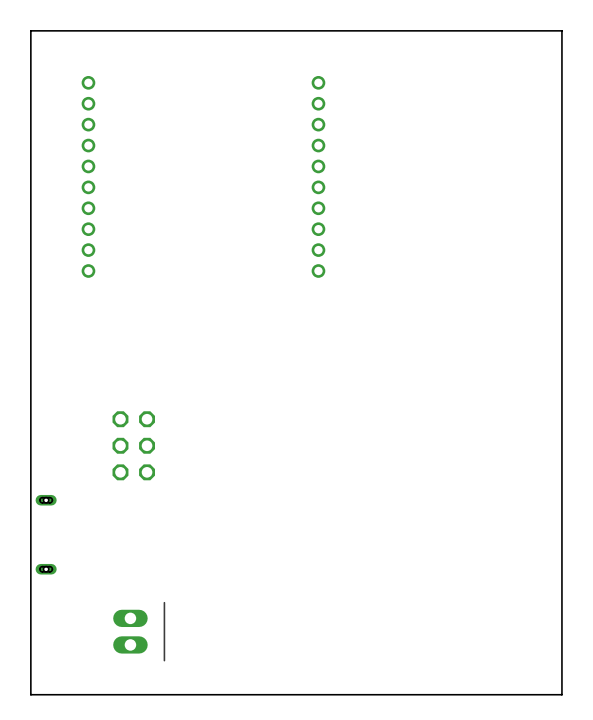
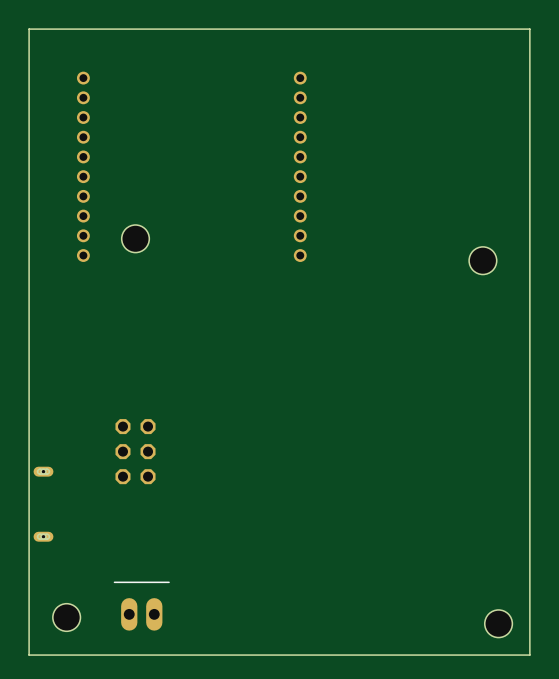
part: none -> (135, 238)
part: none -> (482, 260)
part position: (133, 445) -> (135, 451)
part: (139, 631) -> none
part: none -> (141, 606)
part: none -> (66, 617)
part: none -> (498, 623)

